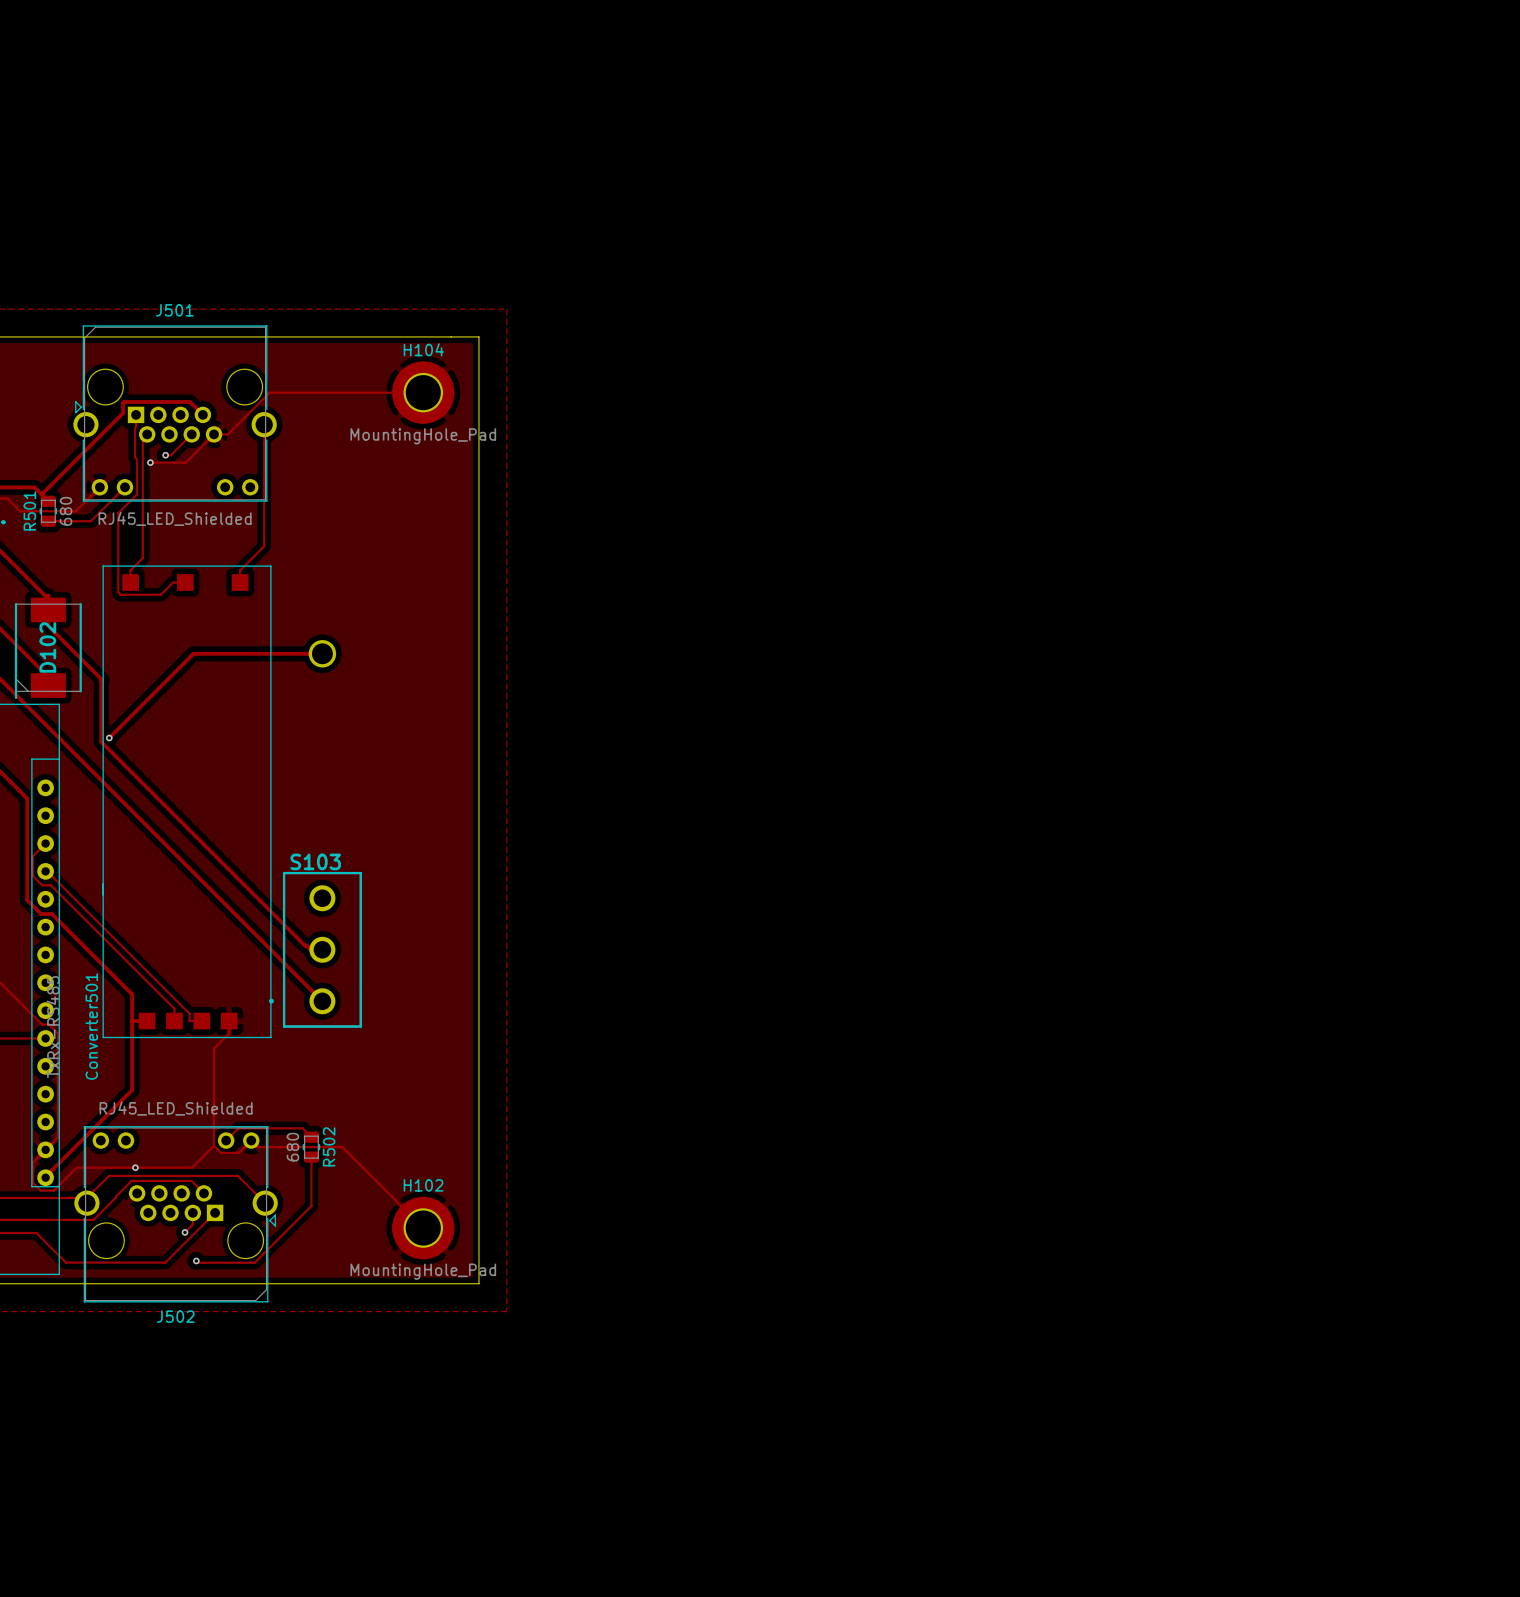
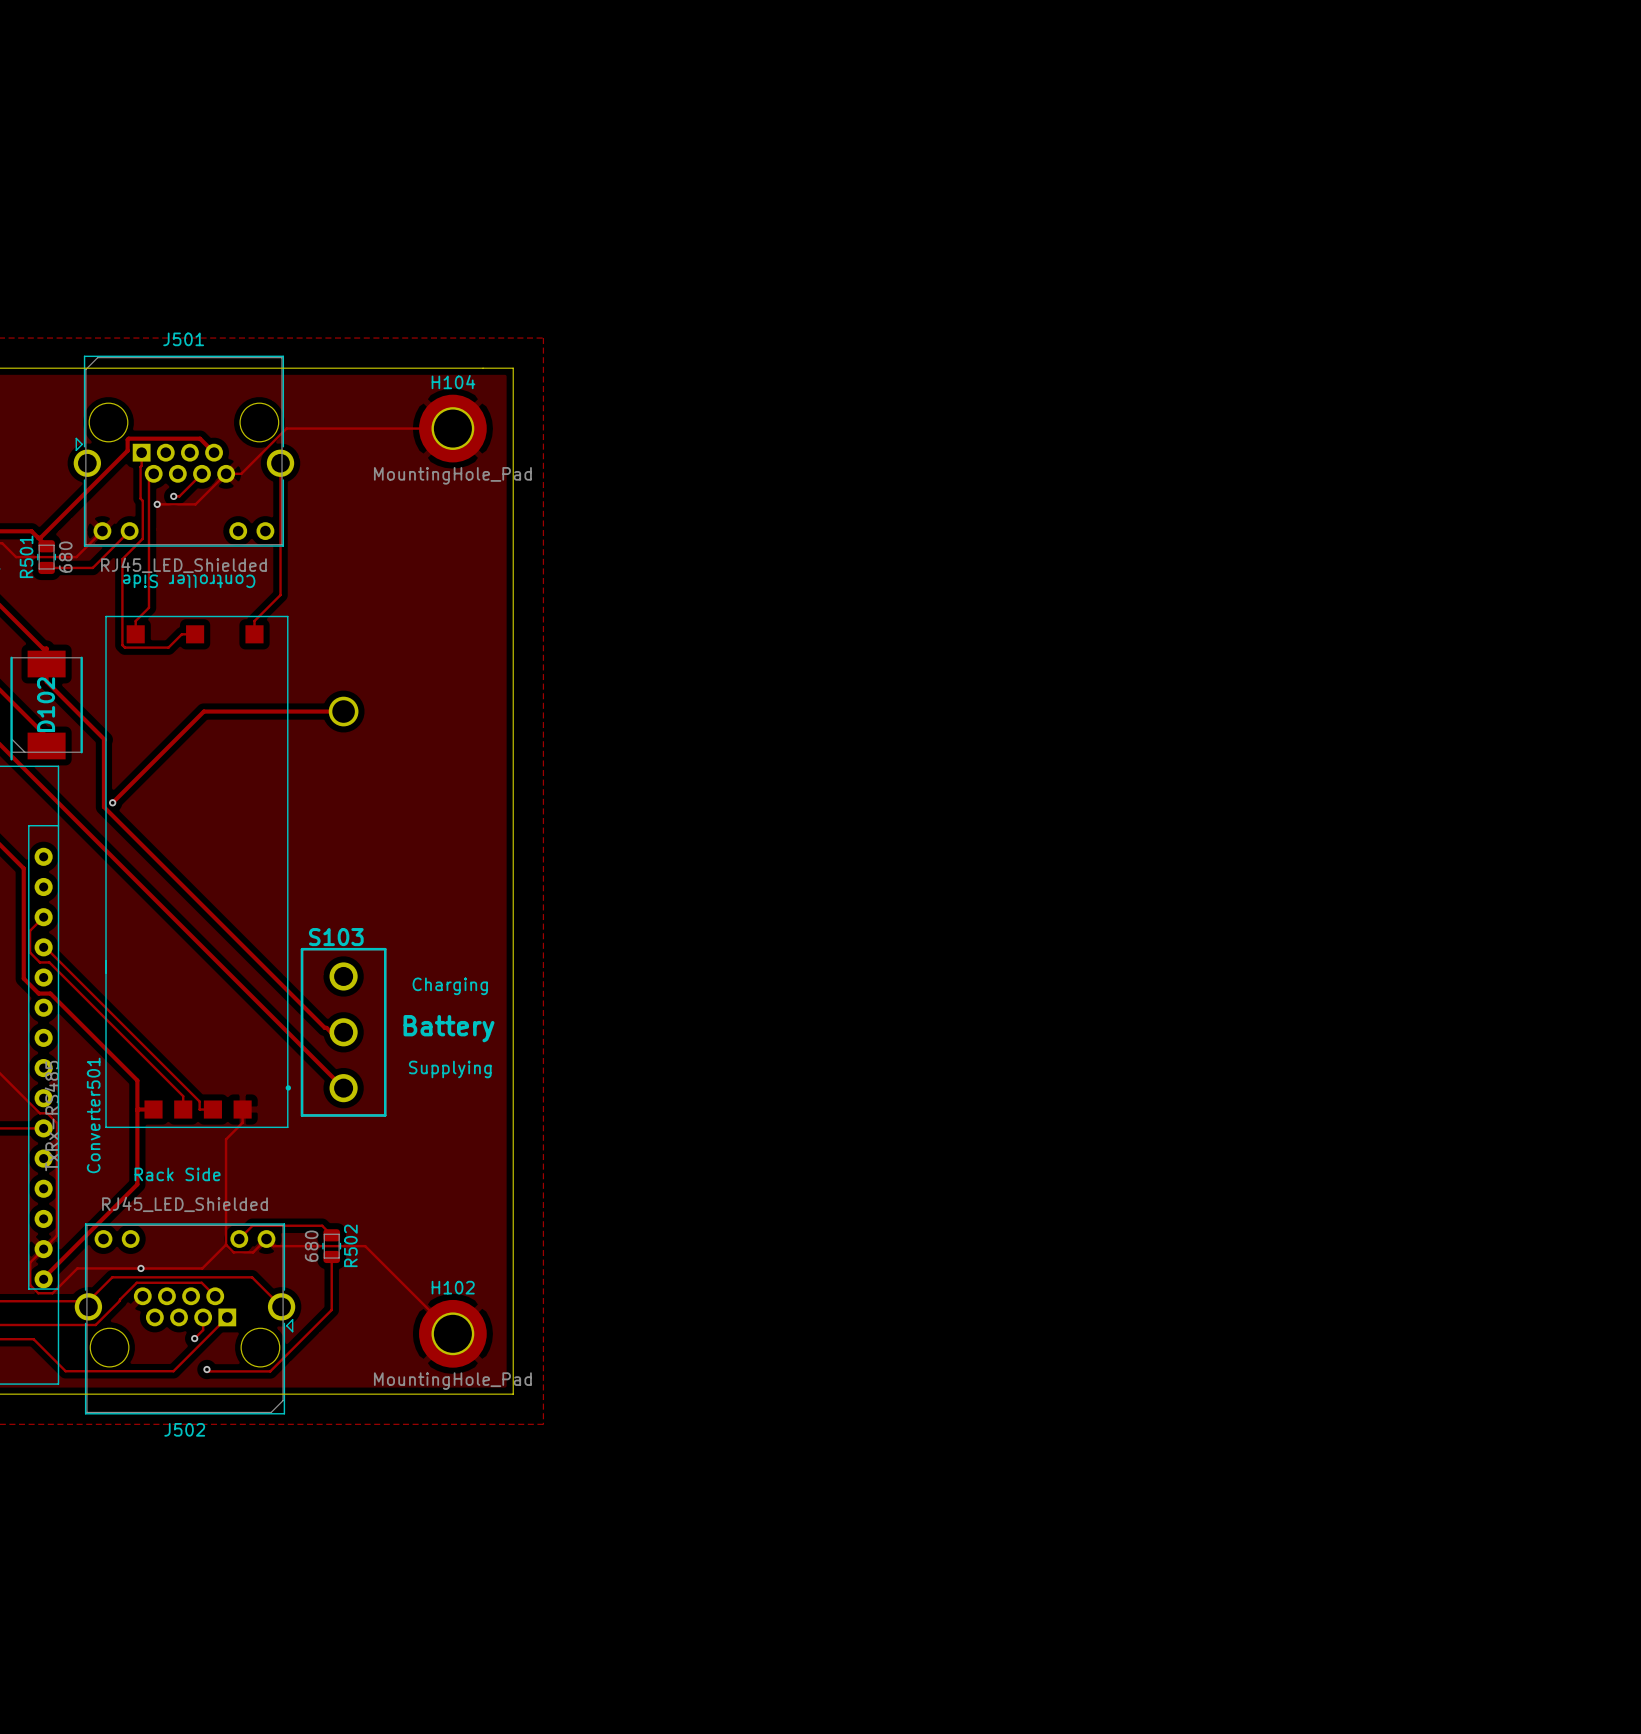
text: none -> Controller Side (189, 581)
text: none -> Charging (450, 986)
text: none -> Battery (448, 1028)
text: none -> Supplying (450, 1069)
text: none -> Rack Side (177, 1174)

